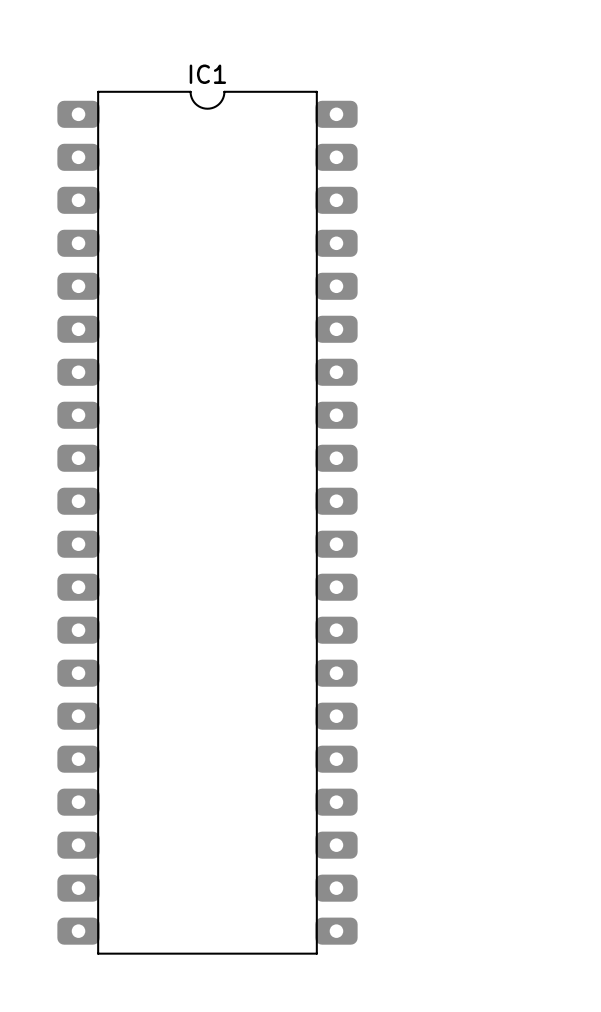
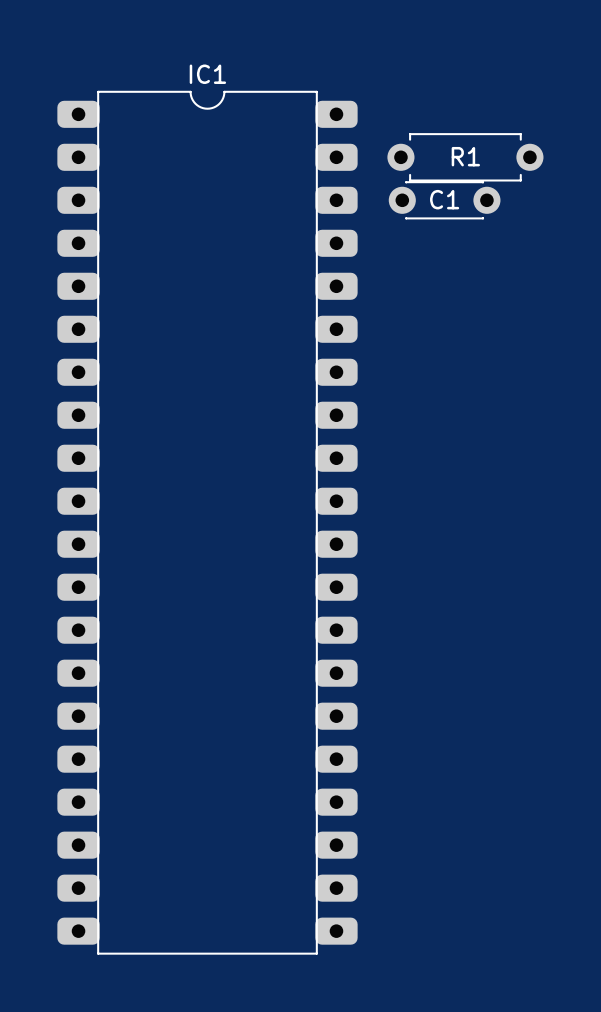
R1: none -> (465, 157)
C1: none -> (444, 200)

